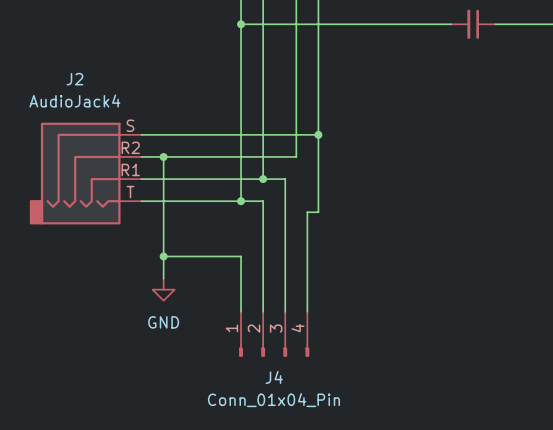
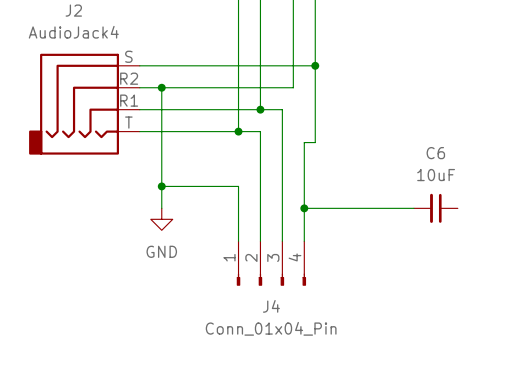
wire: none -> (304, 208) (413, 208)
junction: none -> (304, 208)
C6: none -> 10uF (435, 208)

